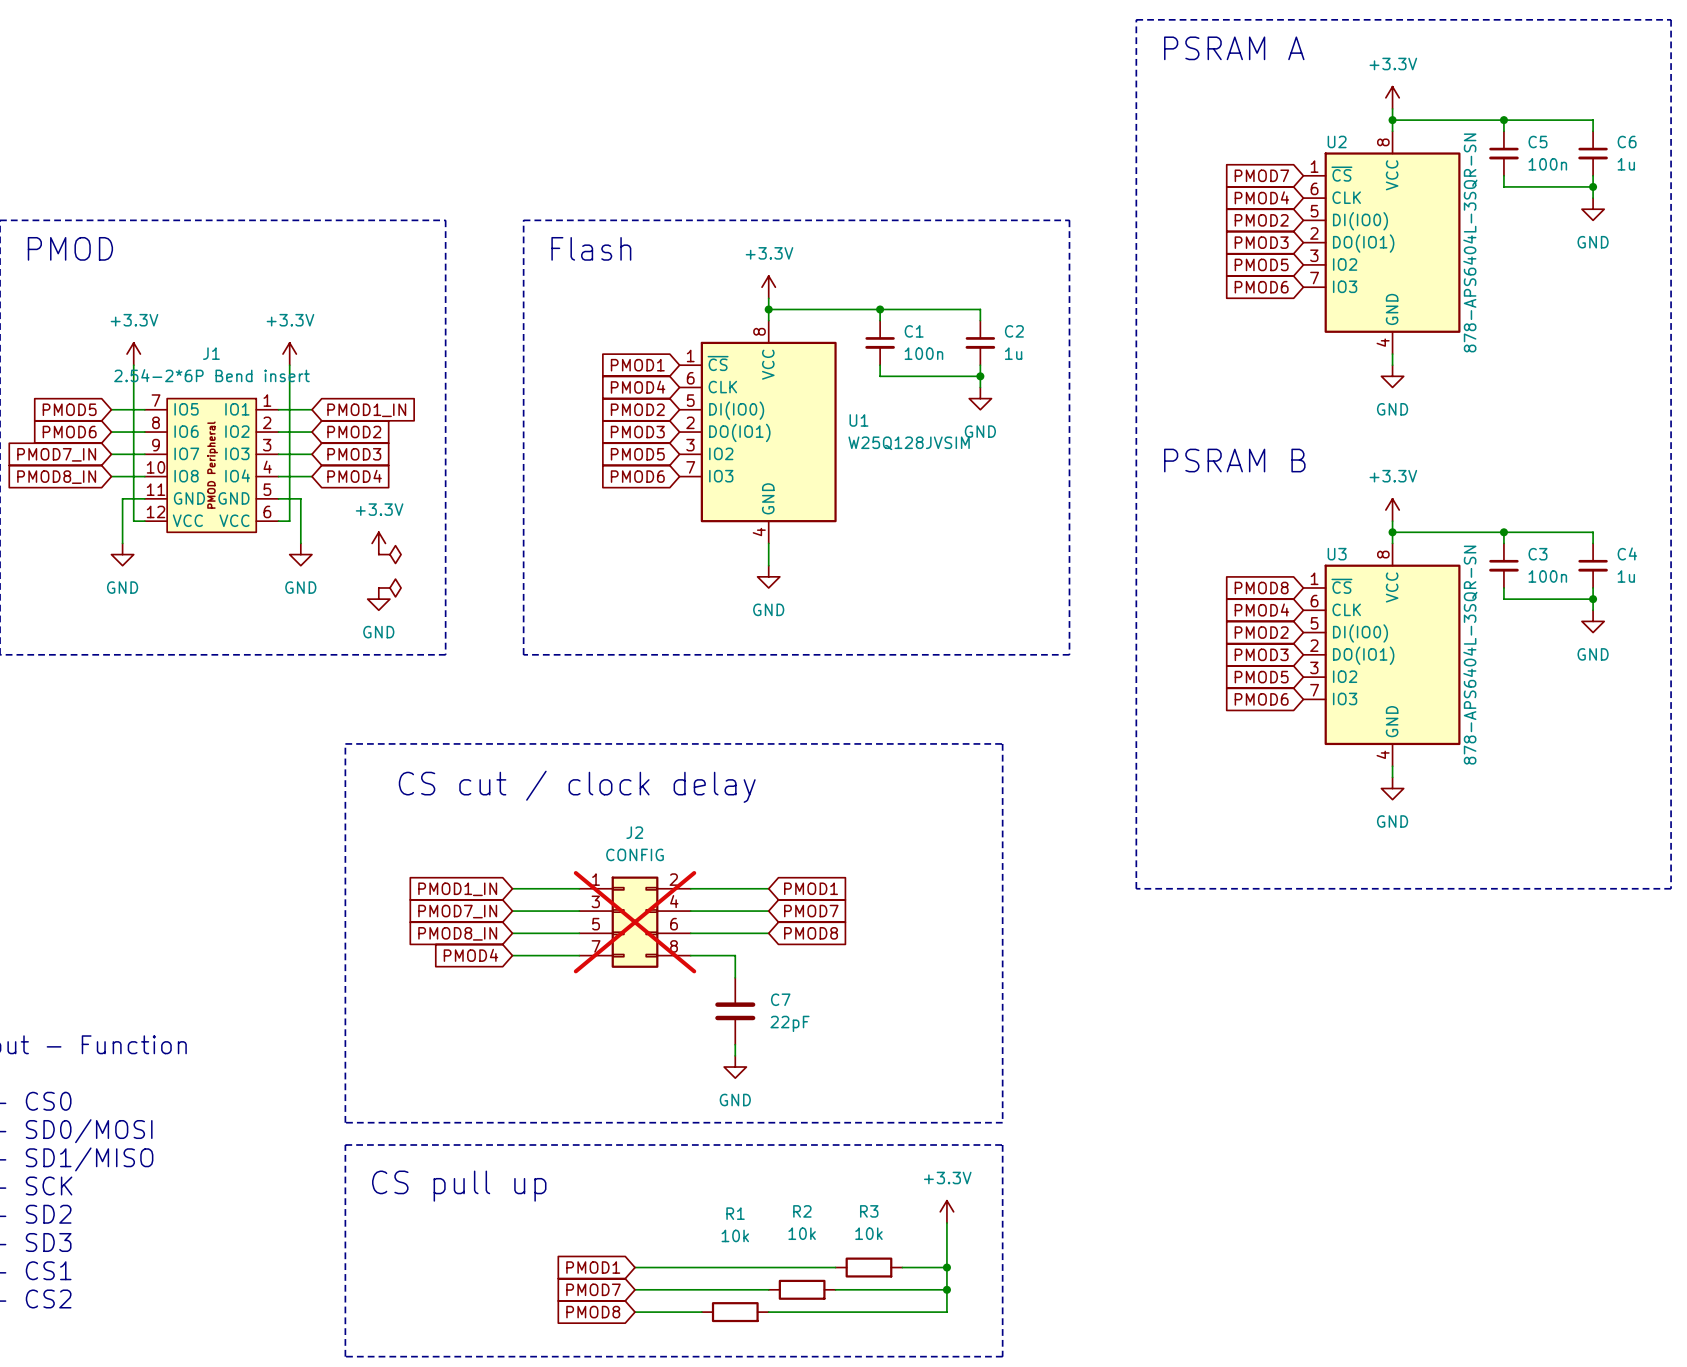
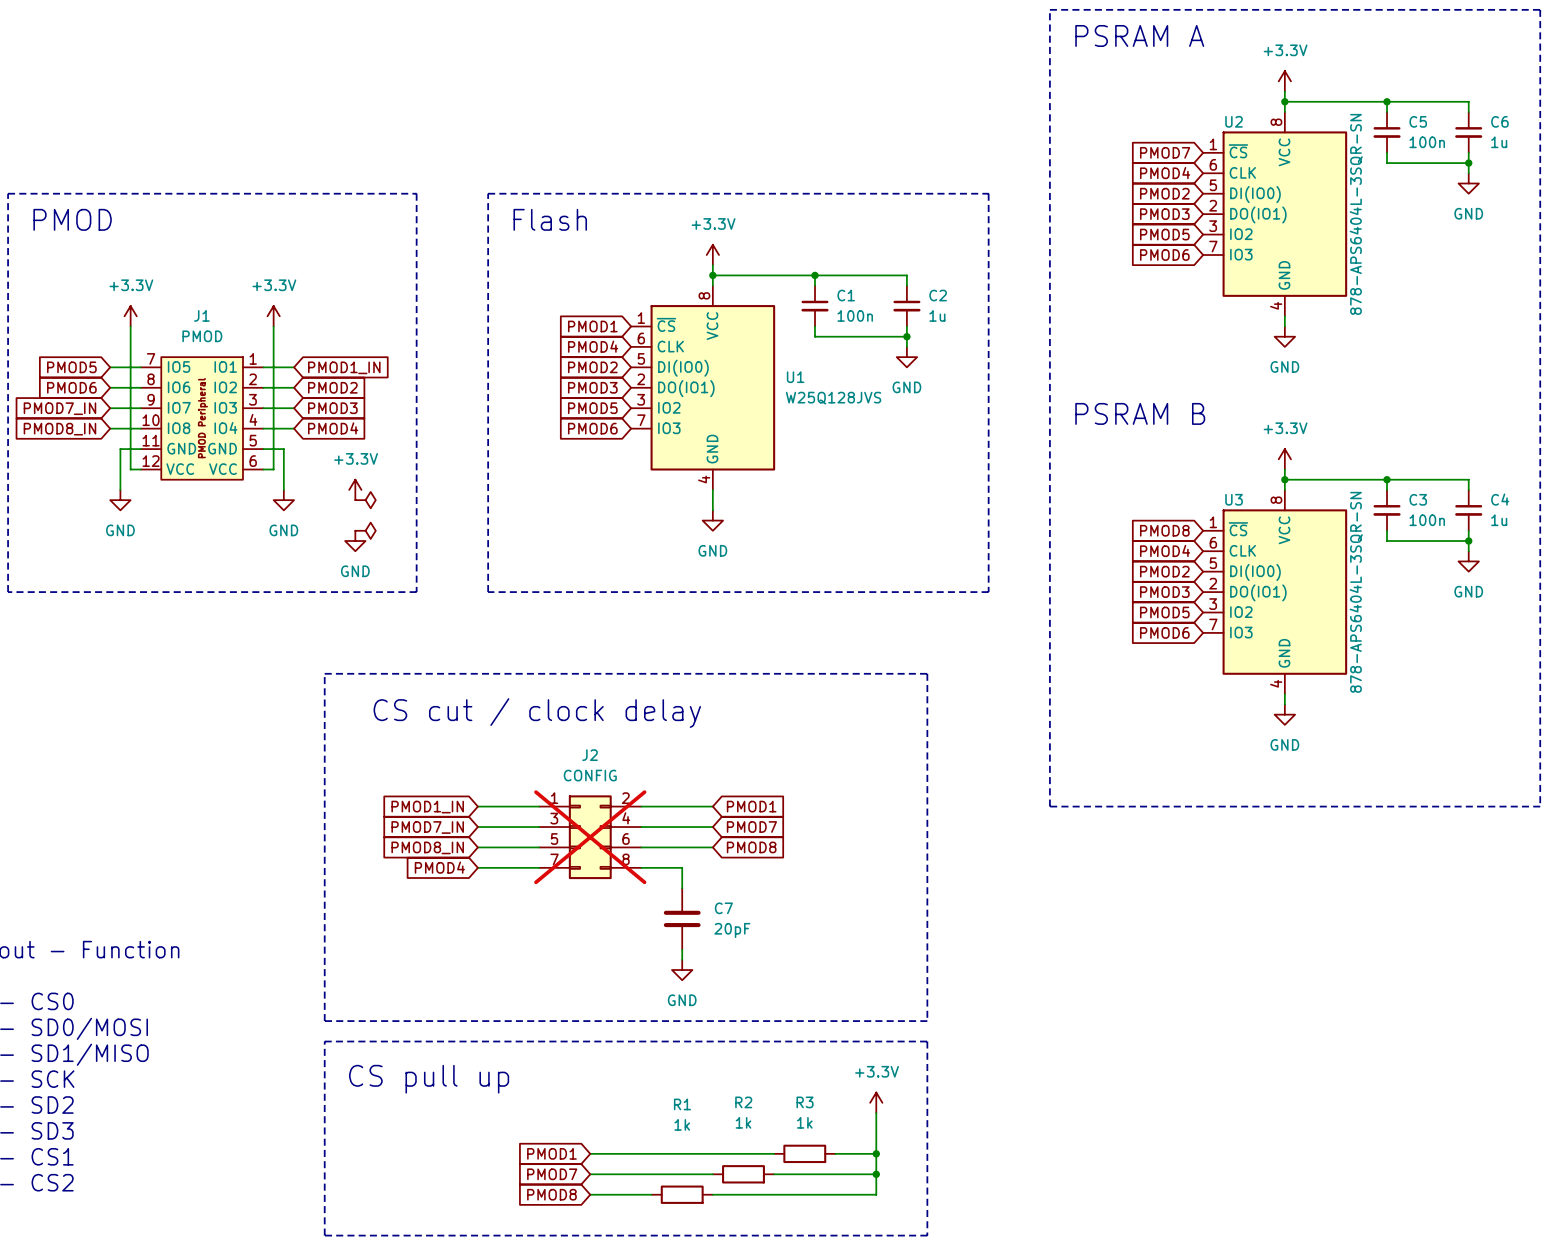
J1 value: 2.54-2*6P Bend insert (211, 375) -> PMOD (202, 336)
U1 value: W25Q128JVSIM (909, 443) -> W25Q128JVS (833, 398)
C7 value: 22pF (790, 1023) -> 20pF (732, 930)
R2 value: 10k (802, 1233) -> 1k (743, 1122)
R3 value: 10k (868, 1233) -> 1k (804, 1122)
R1 value: 10k (735, 1235) -> 1k (682, 1124)

